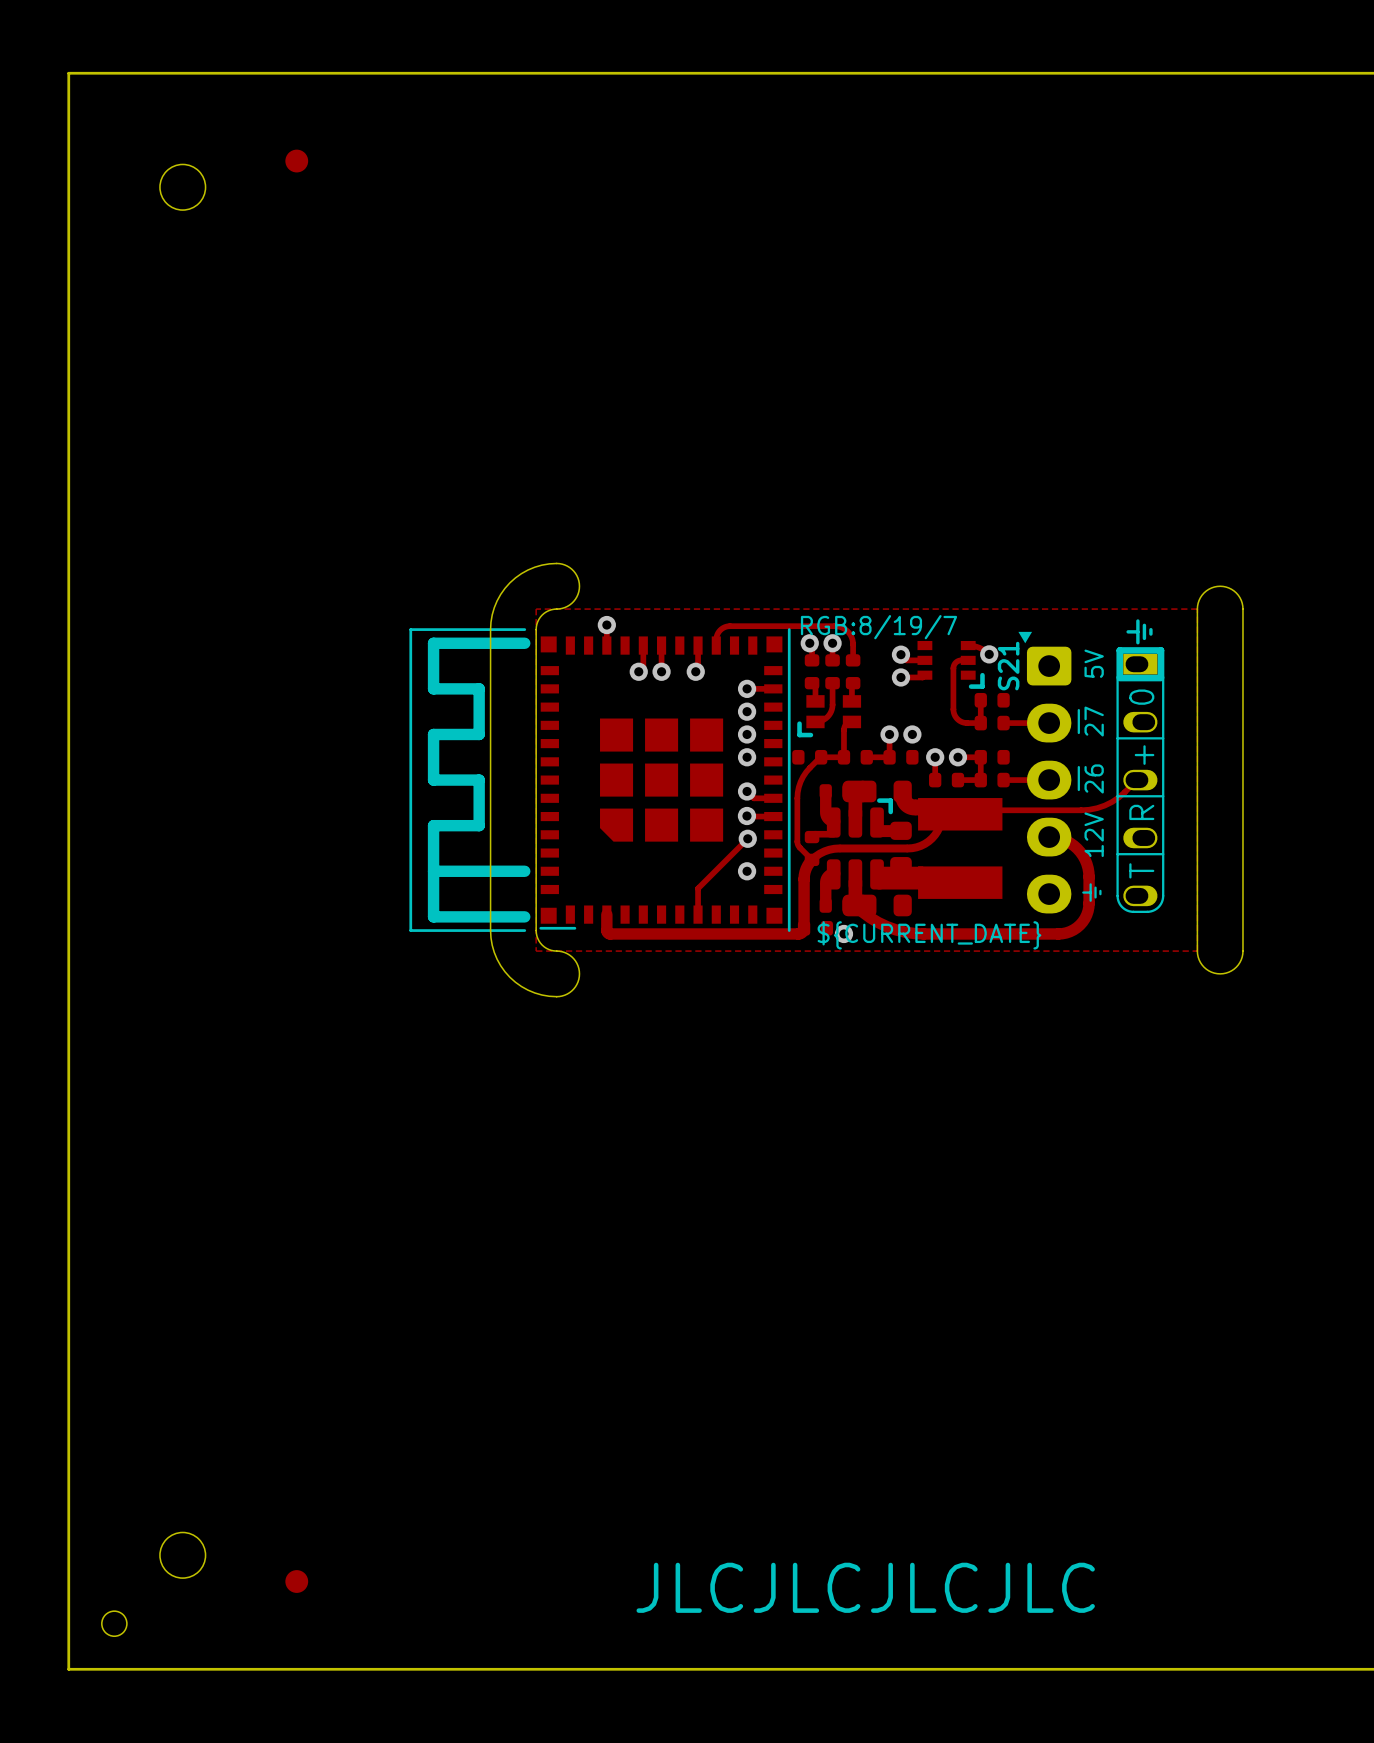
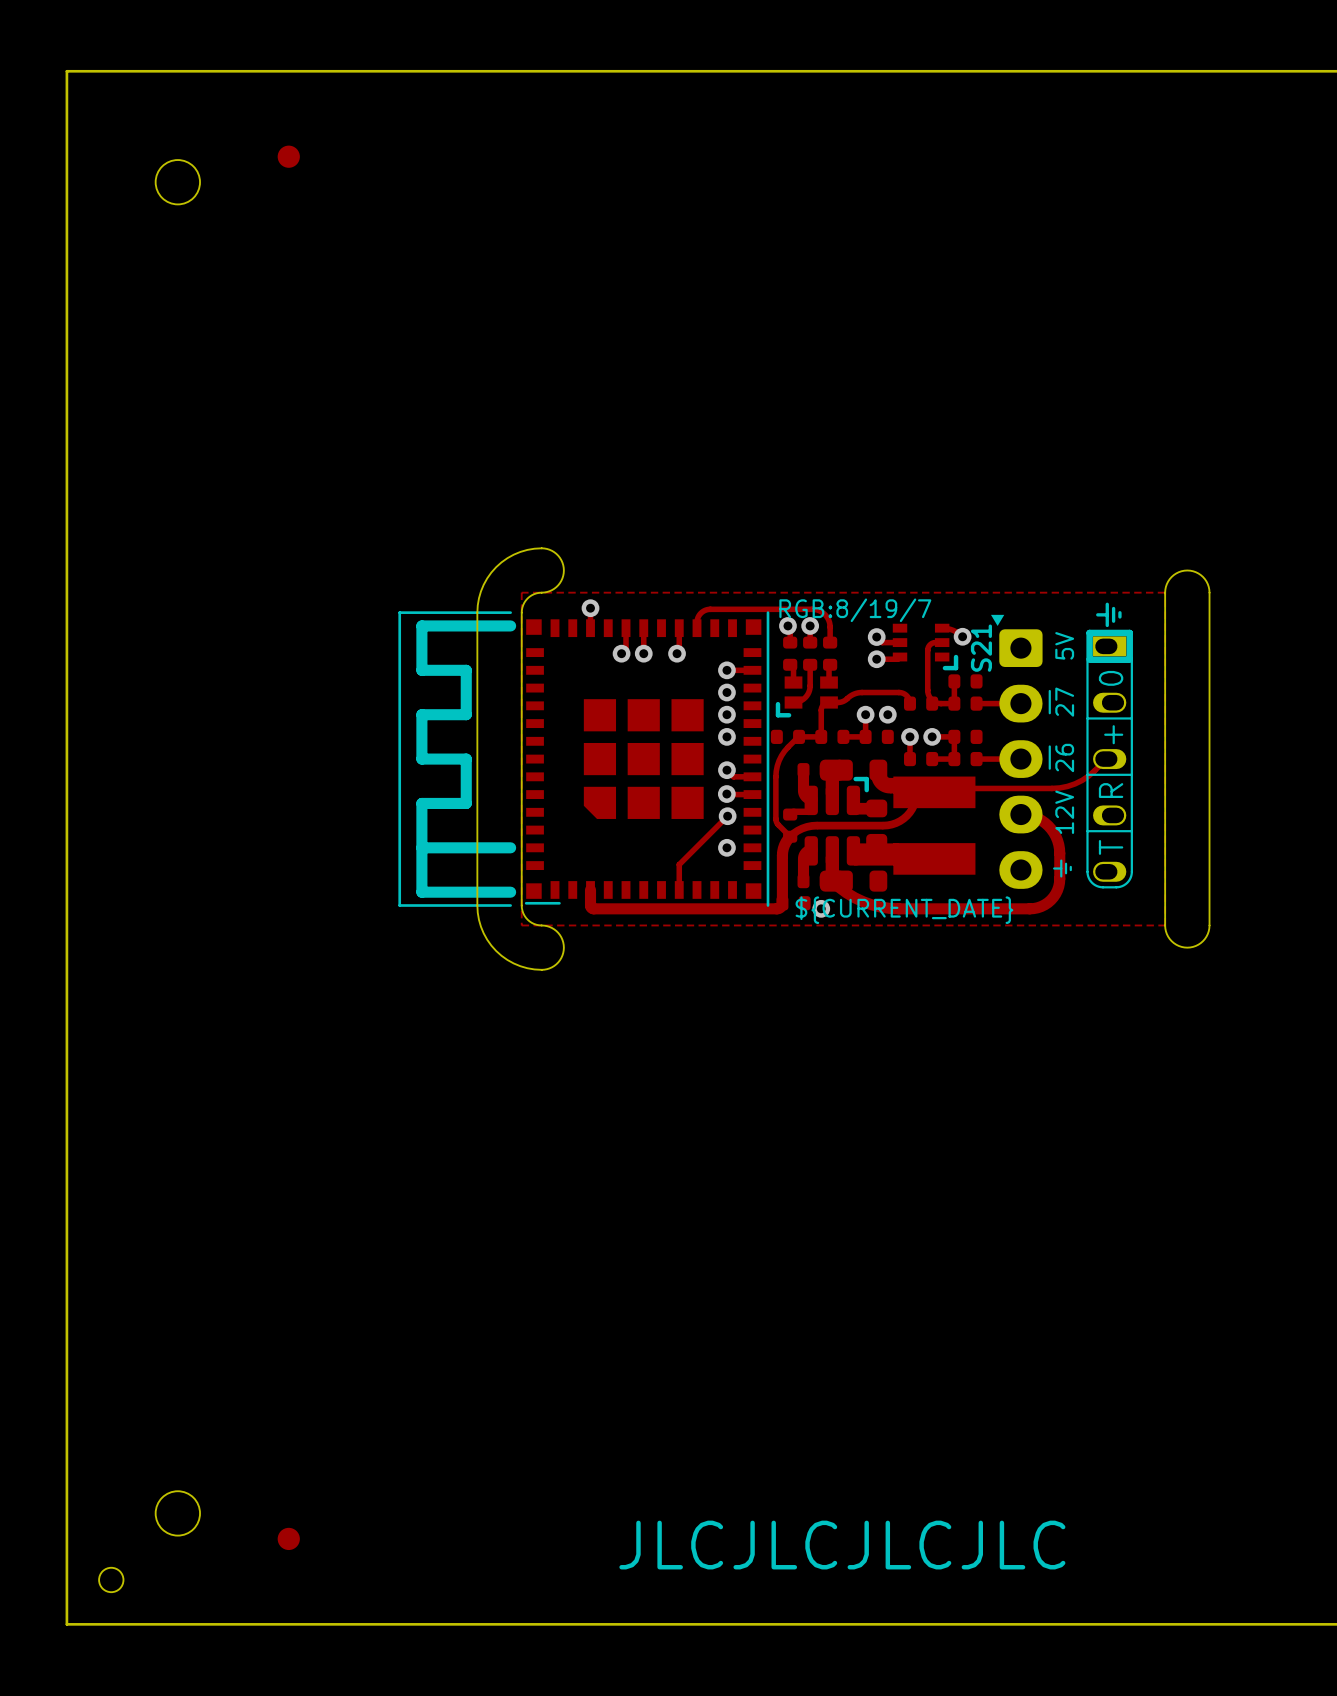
track: none -> (829, 702) (841, 702) (860, 692) (898, 692) (906, 695) (910, 703)
part: none -> (921, 703)

